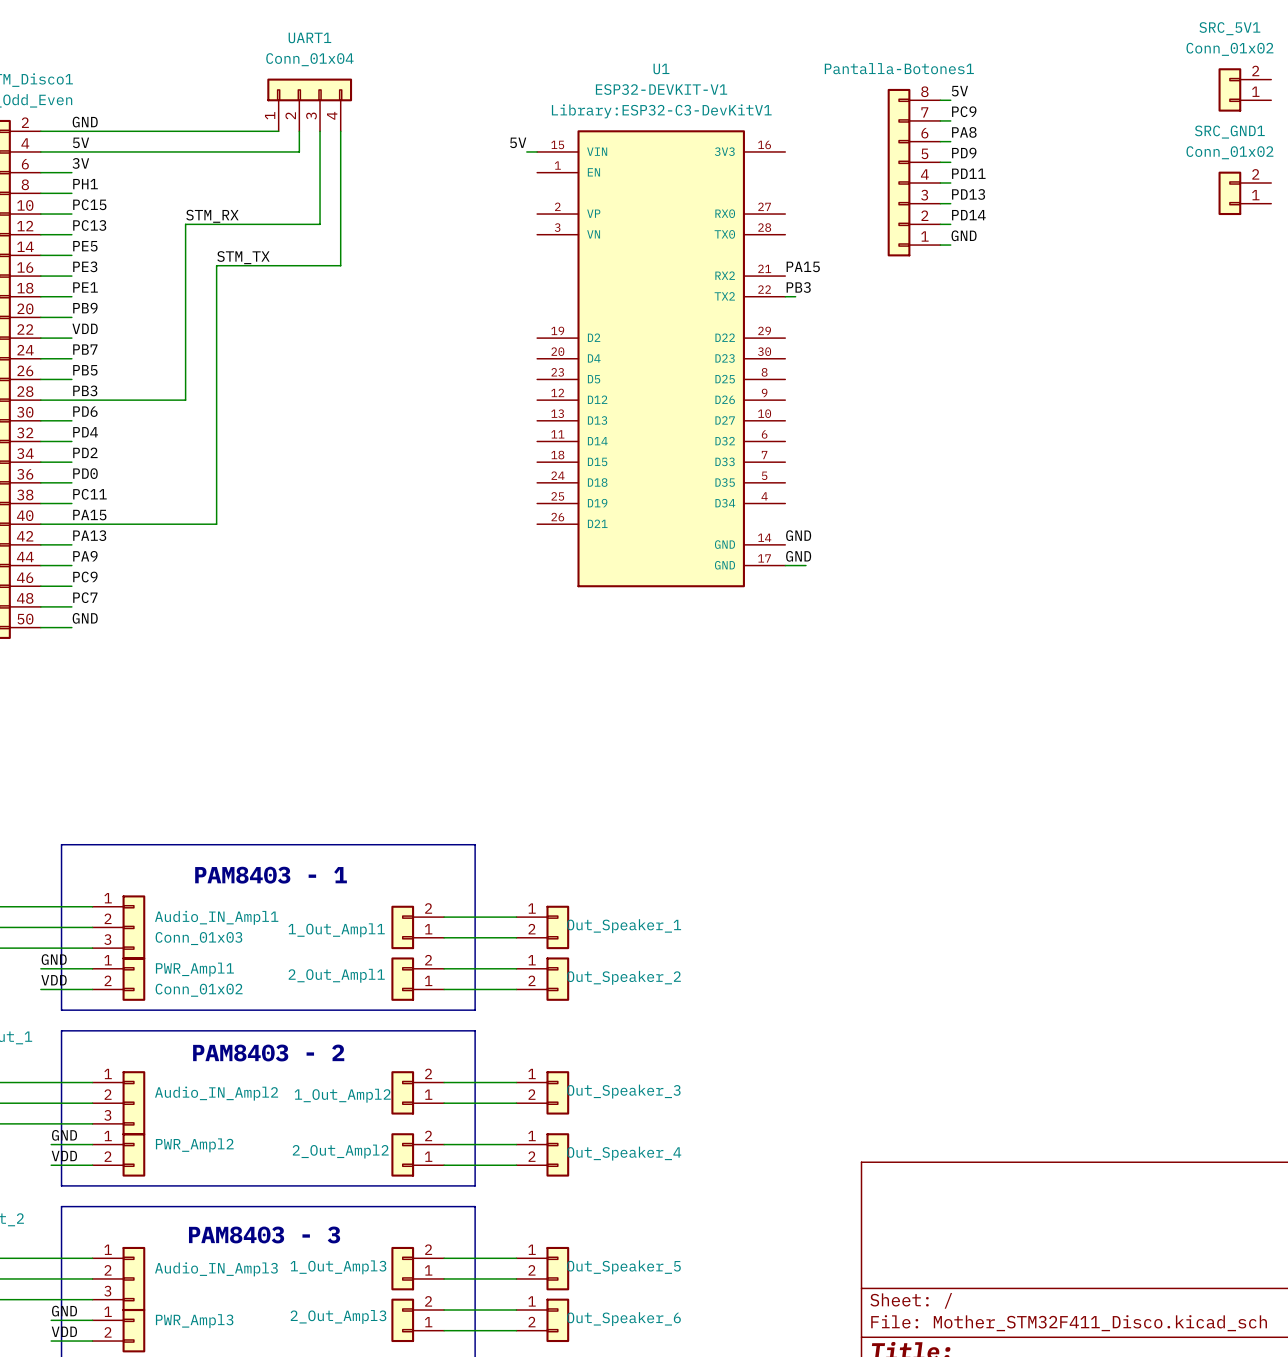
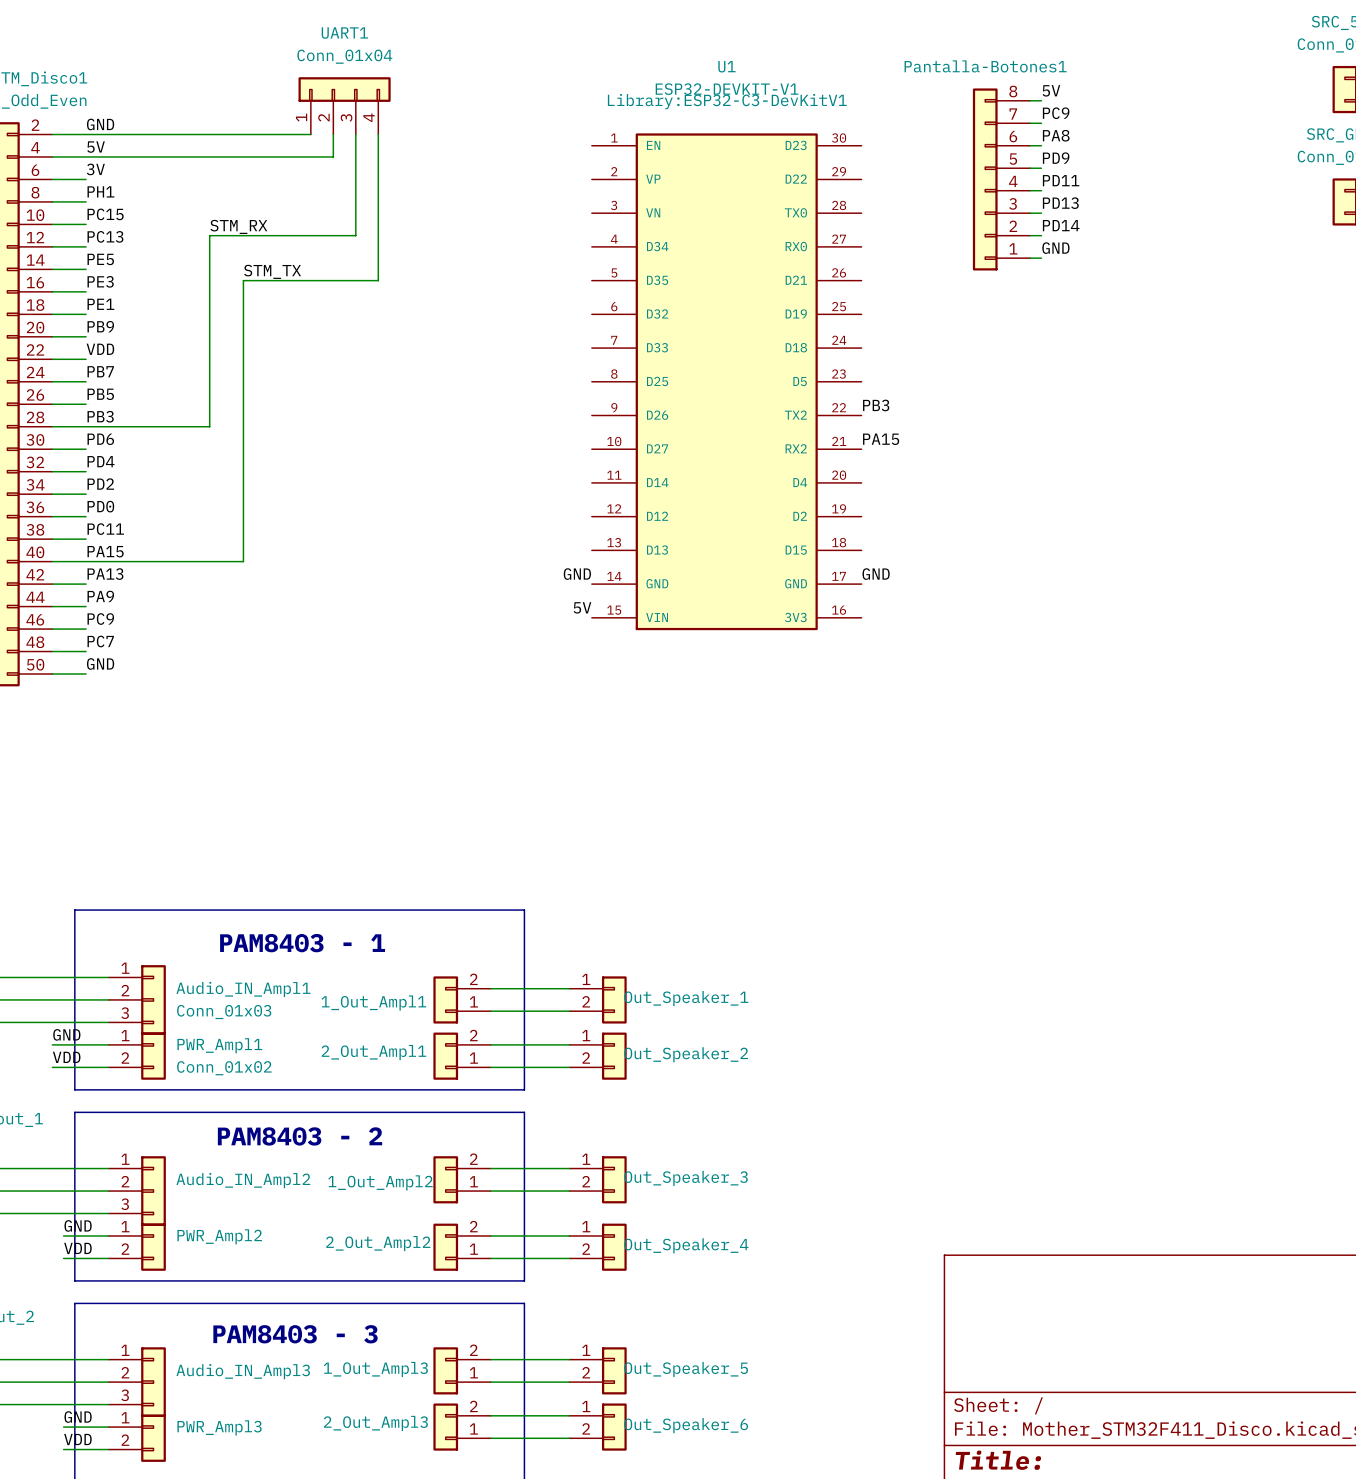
U1 symbol: [537, 130, 786, 588] -> [591, 133, 862, 631]
label: 5V (518, 142) -> none
wire: (526, 151) (537, 151) -> none
label position: PA15 (803, 266) -> PA15 (881, 439)
label position: PB3 (798, 287) -> PB3 (876, 405)
wire: (785, 296) (795, 296) -> none
label: none -> GND (577, 574)
label: GND (798, 556) -> none
wire: (785, 565) (805, 565) -> none
label: none -> 5V (582, 607)

